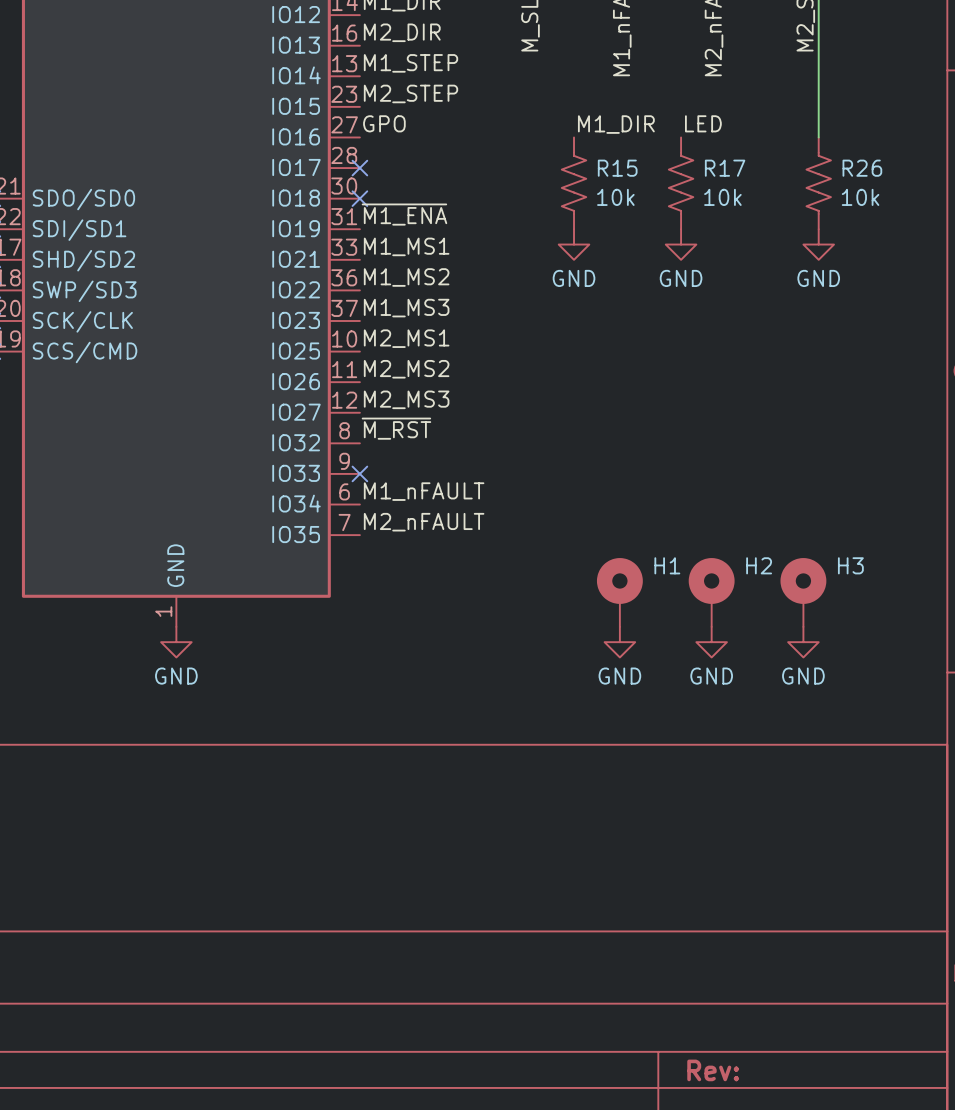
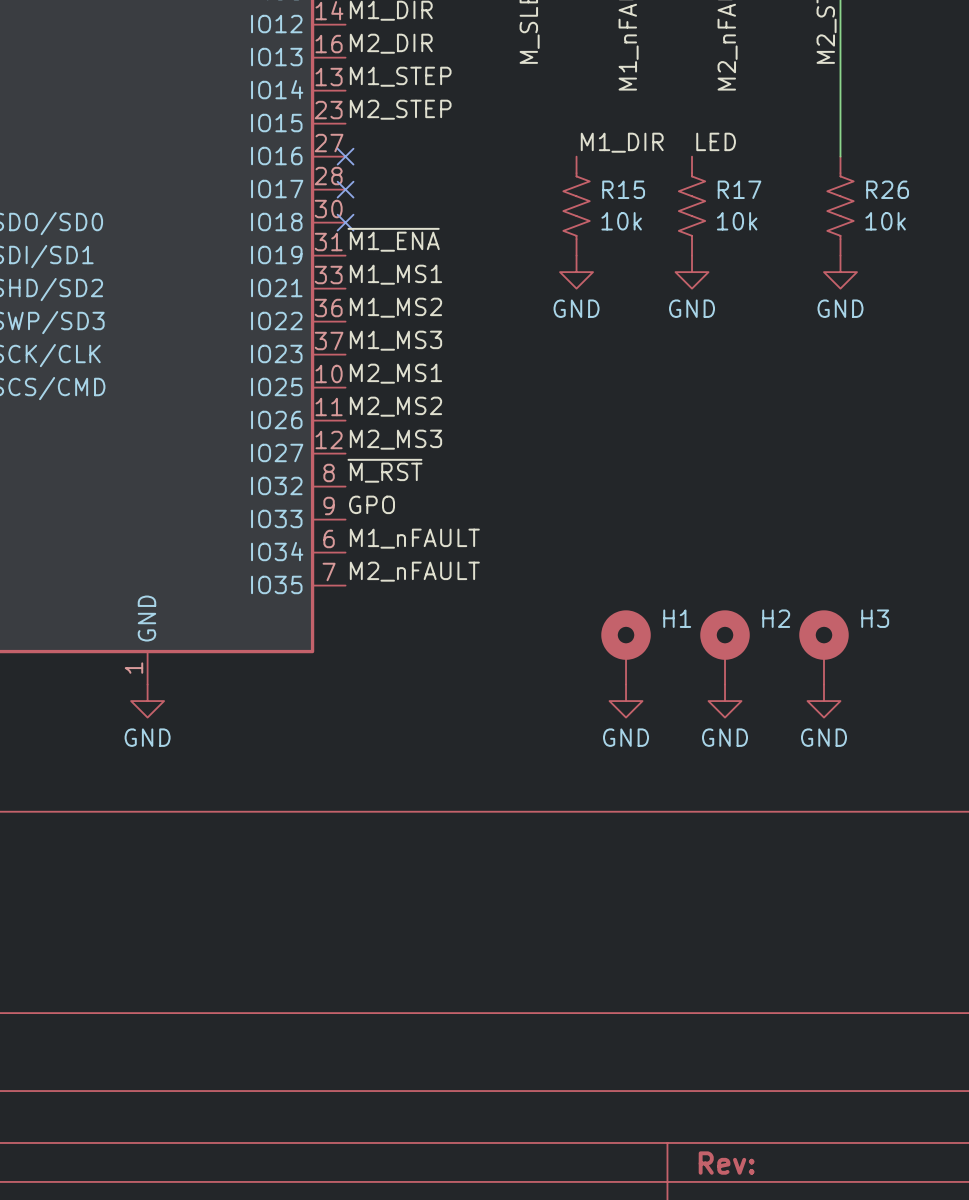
label: GPO (384, 123) -> none
no-connect mark: none -> (345, 156)
label: none -> GPO (372, 504)
no-connect mark: (359, 473) -> none

